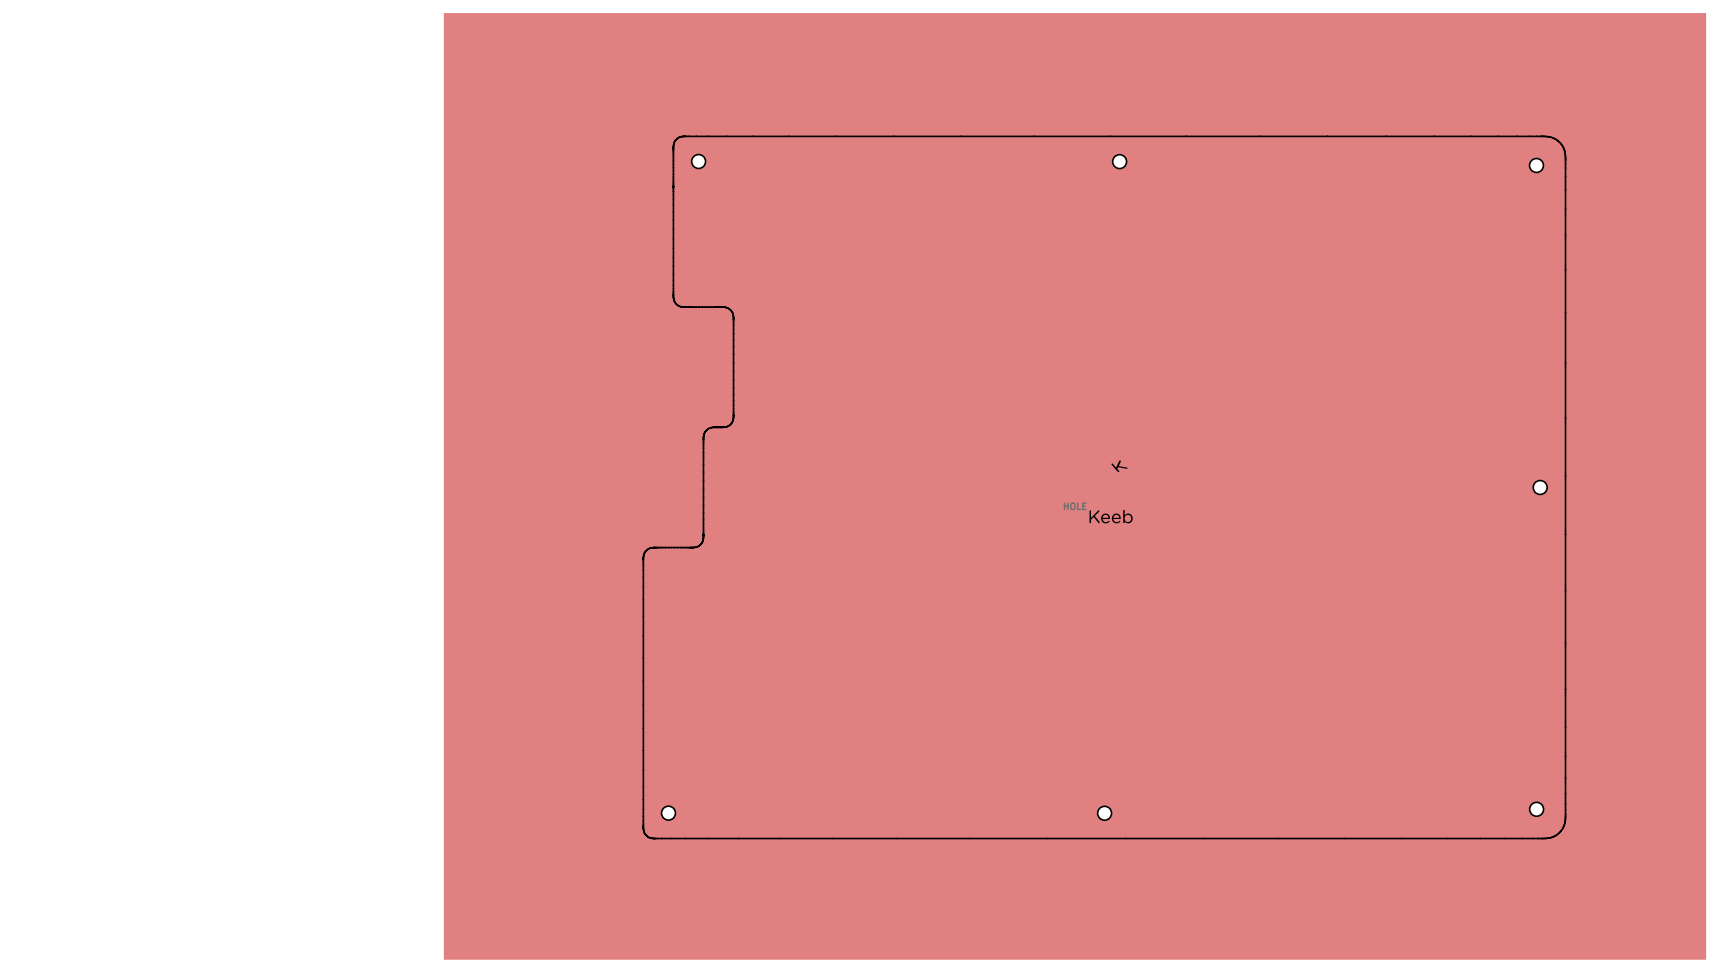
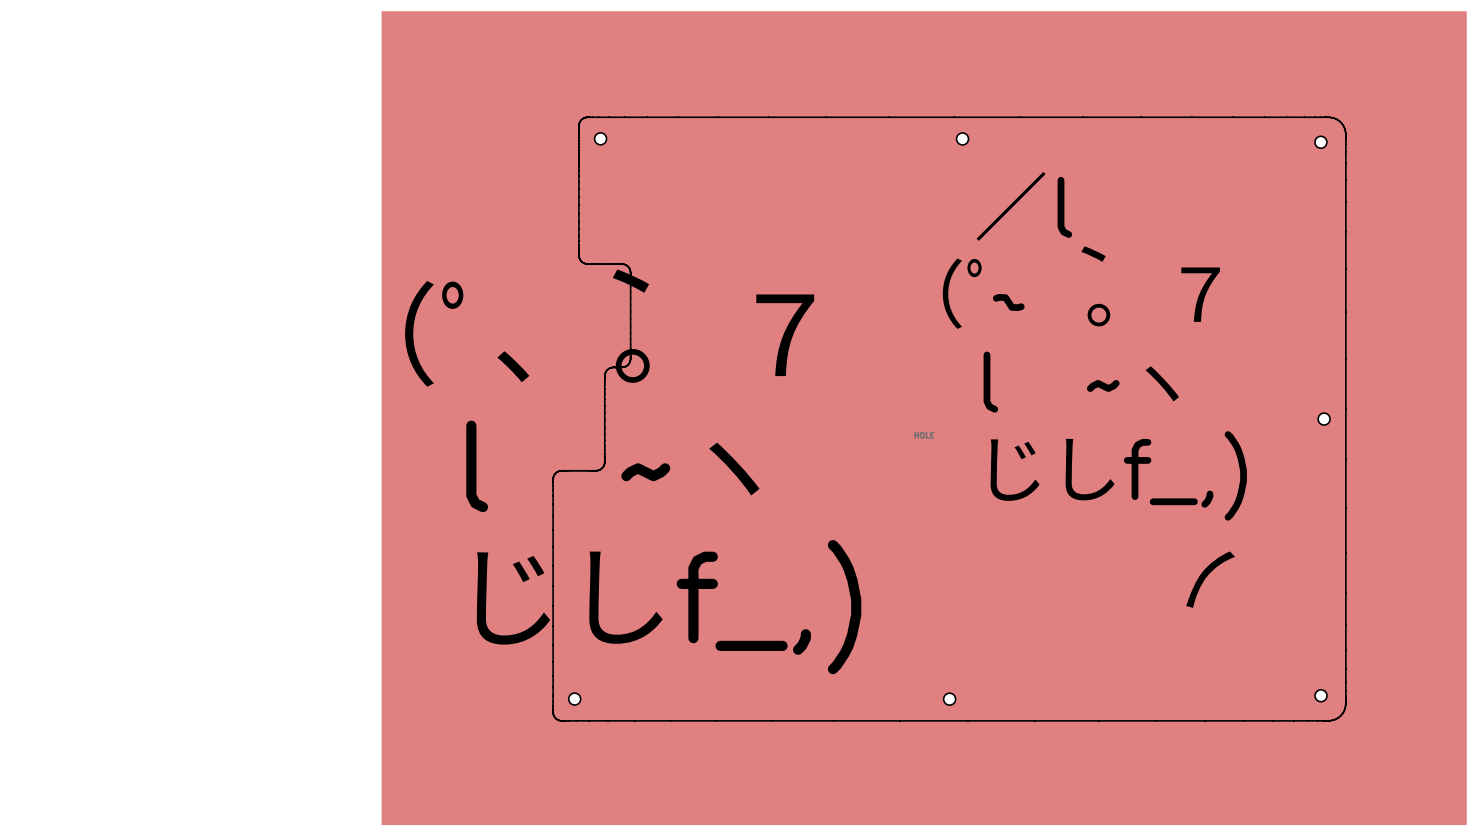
text: none -> ／l (1022, 206)
text: none -> 、 (1093, 254)
text: none -> 、 (630, 281)
text: none -> （ﾟ ｡ ７ (1081, 293)
text: none -> ~ (1008, 302)
text: none -> （ﾟ､ ｡ ７ (609, 333)
text: none -> l ~ヽ (1083, 382)
drawing: [1089, 460, 1133, 524] -> none
text: none -> l ~ヽ (615, 466)
text: none -> じしf_,) (1117, 475)
text: none -> ノ (1210, 579)
text: none -> じしf_,) (666, 607)

